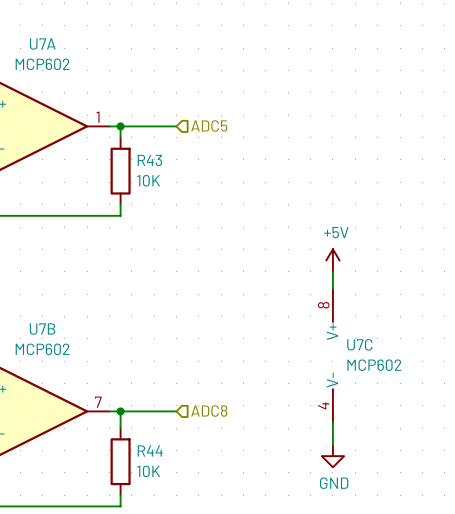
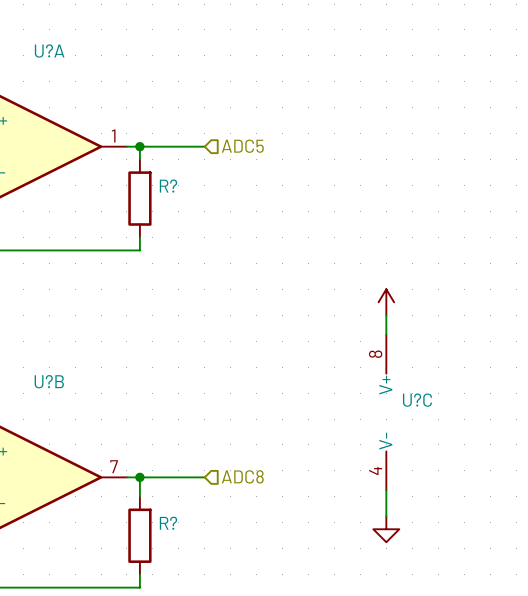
U7A name: U7A (42, 44) -> U?A (49, 50)
U7A value: MCP602 (42, 64) -> none
R43 name: R43 (149, 160) -> R? (168, 186)
R43 value: 10K (148, 180) -> none
power symbol text: +5V (336, 232) -> none
U7B name: U7B (42, 329) -> U?B (49, 381)
U7C name: U7C (359, 344) -> U?C (417, 400)
U7B value: MCP602 (42, 349) -> none
U7C value: MCP602 (374, 365) -> none
R44 name: R44 (150, 451) -> R? (168, 523)
R44 value: 10K (148, 471) -> none
power symbol text: GND (334, 483) -> none

